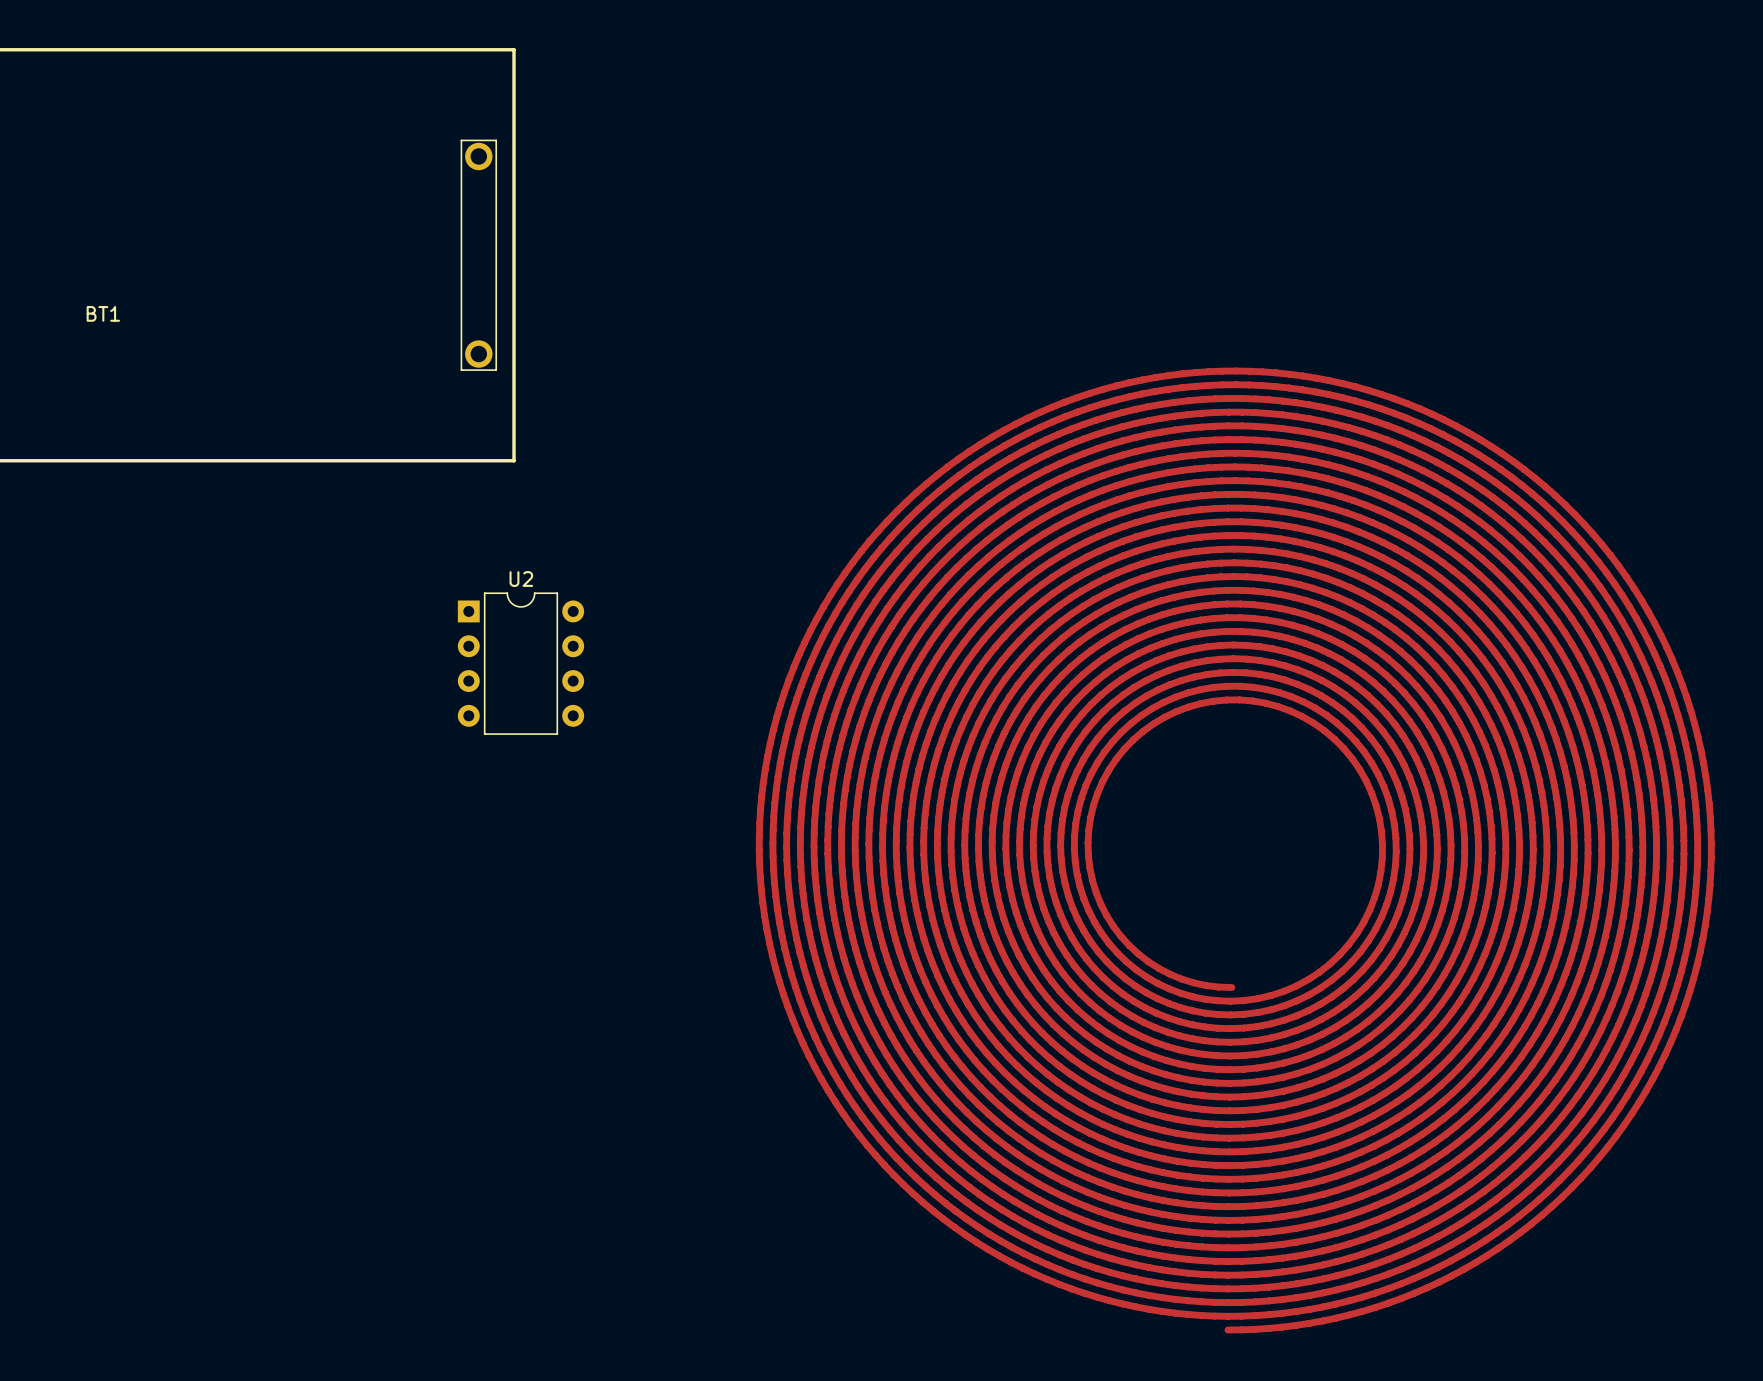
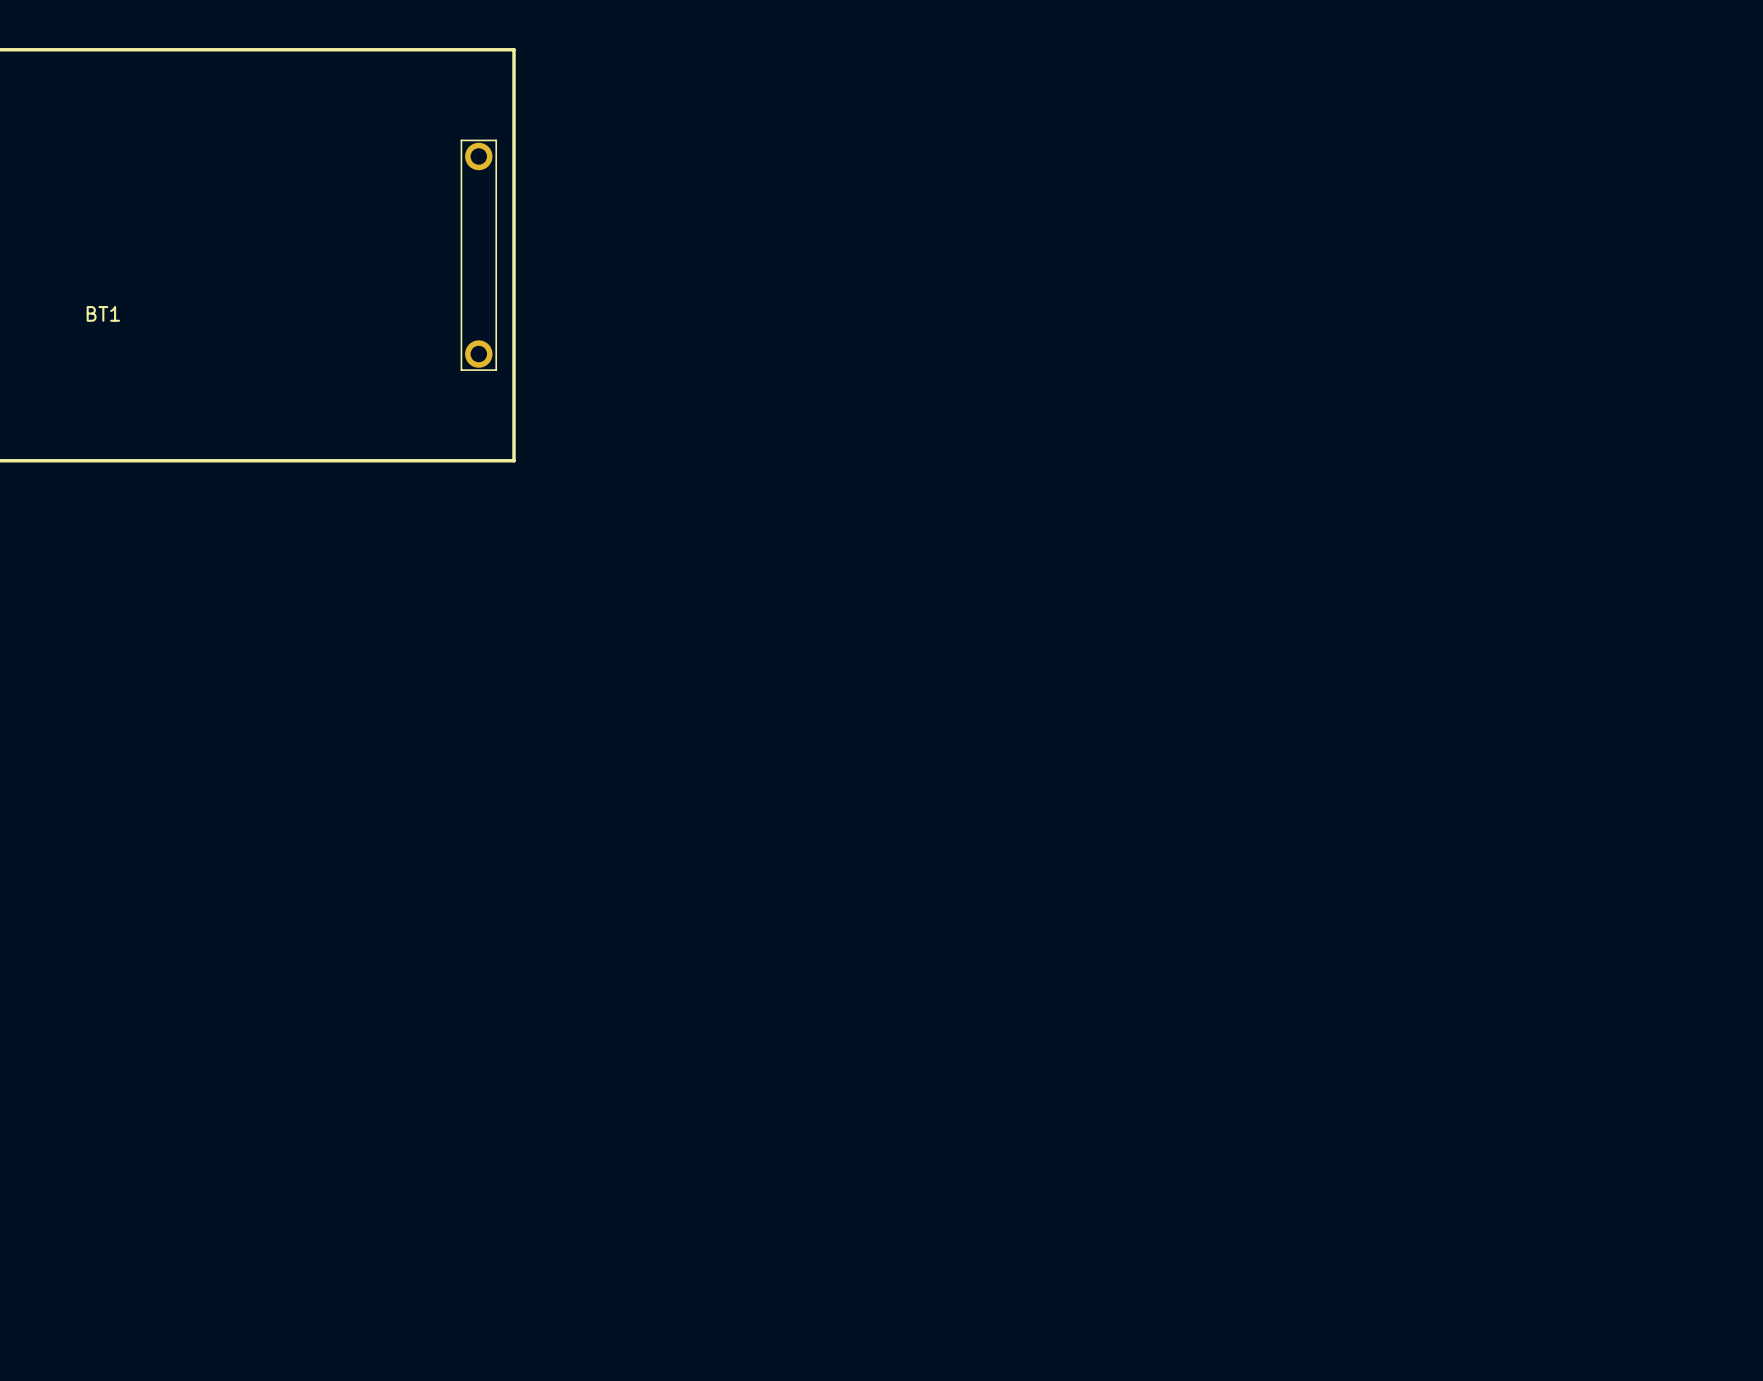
U2: (520, 663) -> none
top track: (1231, 987) (1193, 982) (1159, 968) (1129, 945) (1106, 915) (1092, 880) (1088, 842) (1093, 804) (1109, 769) (1133, 739) (1164, 717) (1200, 703) (1239, 699) (1278, 706) (1313, 723) (1343, 748) (1359, 769) (1376, 805) (1382, 844) (1378, 884) (1363, 922) (1339, 954) (1308, 979) (1270, 995) (1230, 1001) (1205, 999) (1181, 993) (1146, 977) (1117, 952) (1094, 922) (1083, 899) (1077, 874) (1074, 836) (1081, 798) (1097, 762) (1112, 741) (1130, 723) (1163, 702) (1200, 689) (1239, 686) (1278, 692) (1315, 707) (1346, 731) (1371, 762) (1383, 786) (1391, 811) (1396, 851) (1393, 878) (1386, 904) (1368, 940) (1342, 971) (1309, 994) (1271, 1009) (1244, 1014) (1217, 1014) (1193, 1010) (1168, 1003) (1135, 986) (1115, 970) (1098, 951) (1077, 919) (1068, 896) (1062, 871) (1061, 832) (1064, 807) (1072, 782) (1090, 748) (1106, 728) (1124, 710) (1157, 689) (1181, 680) (1207, 674) (1246, 672) (1272, 676) (1297, 684) (1332, 702) (1362, 728) (1385, 759) (1397, 783) (1405, 808) (1409, 835) (1409, 861) (1405, 888) (1397, 913) (1379, 949) (1362, 970) (1343, 988) (1308, 1010) (1270, 1023) (1243, 1028) (1217, 1028) (1192, 1024) (1168, 1017) (1144, 1007) (1123, 994) (1103, 977) (1086, 958) (1065, 926) (1056, 902) (1049, 877) (1047, 852) (1047, 826) (1052, 800) (1060, 776) (1078, 741) (1094, 721) (1112, 702) (1145, 680) (1169, 670) (1194, 662) (1233, 658) (1259, 660) (1285, 665) (1322, 680) (1344, 694) (1365, 711) (1390, 741) (1404, 764) (1414, 789) (1420, 815) (1423, 841) (1422, 868) (1418, 895) (1409, 920) (1398, 944) (1383, 967) (1365, 987) (1344, 1004) (1321, 1019) (1296, 1030) (1270, 1037) (1230, 1042) (1192, 1038) (1167, 1032) (1143, 1022) (1121, 1009) (1100, 994) (1082, 975) (1066, 955) (1053, 933) (1043, 909) (1037, 884) (1033, 858) (1033, 832) (1036, 806) (1043, 781) (1053, 757) (1066, 734) (1082, 713) (1100, 695) (1121, 679) (1144, 666) (1168, 655) (1194, 648) (1233, 645) (1259, 646) (1285, 651) (1311, 660) (1334, 671) (1357, 686) (1377, 704) (1402, 735) (1421, 770) (1430, 795) (1435, 821) (1437, 848) (1435, 875) (1430, 902) (1421, 927) (1410, 951) (1395, 974) (1377, 994) (1356, 1012) (1334, 1027) (1309, 1039) (1284, 1048) (1257, 1054) (1217, 1055) (1179, 1049) (1155, 1042) (1131, 1031) (1110, 1018) (1080, 993) (1063, 974) (1049, 953) (1037, 930) (1025, 893) (1020, 867) (1019, 842) (1021, 816) (1026, 790) (1034, 766) (1045, 742) (1059, 720) (1076, 700) (1094, 682) (1115, 666) (1138, 653) (1162, 643) (1187, 636) (1213, 632) (1240, 631) (1266, 633) (1292, 639) (1317, 647) (1340, 659) (1363, 674) (1383, 691) (1401, 710) (1417, 732) (1435, 767) (1443, 792) (1448, 818) (1451, 845) (1448, 885) (1442, 911) (1432, 936) (1420, 960) (1397, 993) (1378, 1012) (1357, 1029) (1334, 1043) (1309, 1054) (1283, 1063) (1257, 1068) (1217, 1069) (1179, 1063) (1154, 1056) (1119, 1040) (1097, 1026) (1068, 1000) (1051, 981) (1025, 936) (1012, 900) (1007, 874) (1005, 848) (1006, 822) (1014, 784) (1022, 759) (1033, 735) (1047, 713) (1073, 683) (1093, 666) (1114, 651) (1137, 638) (1162, 629) (1187, 622) (1213, 618) (1240, 617) (1266, 619) (1292, 625) (1317, 633) (1342, 644) (1364, 658) (1385, 674) (1404, 693) (1421, 714) (1441, 748) (1452, 773) (1461, 812) (1464, 838) (1462, 879) (1457, 905) (1449, 931) (1438, 955) (1417, 990) (1399, 1010) (1369, 1037) (1346, 1052) (1309, 1069) (1283, 1077) (1257, 1081) (1229, 1083) (1191, 1080) (1166, 1074) (1129, 1061) (1106, 1049) (1075, 1026) (1056, 1008) (1032, 977) (1019, 955) (1003, 919) (997, 893) (992, 854) (992, 828) (998, 789) (1005, 764) (1022, 728) (1036, 706) (1061, 676) (1080, 658) (1125, 629) (1161, 614) (1187, 608) (1240, 603) (1280, 608) (1305, 614) (1354, 635) (1397, 667) (1433, 707) (1453, 741) (1468, 779) (1476, 818) (1478, 845) (1475, 886) (1470, 912) (1456, 950) (1444, 974) (1420, 1007) (1402, 1027) (1370, 1053) (1347, 1067) (1310, 1083) (1283, 1091) (1257, 1095) (1216, 1096) (1178, 1091) (1140, 1080) (1105, 1064) (1083, 1050) (1053, 1024) (1035, 1005) (1013, 973) (1001, 950) (987, 913) (980, 874) (978, 835) (980, 808) (989, 770) (998, 745) (1016, 710) (1032, 688) (1058, 659) (1079, 642) (1124, 614) (1161, 600) (1187, 594) (1240, 590) (1280, 594) (1306, 600) (1355, 620) (1389, 642) (1410, 659) (1445, 700) (1465, 735) (1480, 772) (1489, 812) (1491, 839) (1490, 879) (1482, 919) (1468, 957) (1456, 981) (1432, 1015) (1414, 1035) (1383, 1061) (1360, 1076) (1323, 1093) (1297, 1101) (1257, 1109) (1216, 1110) (1178, 1105) (1140, 1095) (1105, 1079) (1082, 1066) (1052, 1042) (1025, 1013) (1002, 981) (990, 958) (976, 922) (967, 884) (964, 844) (966, 818) (972, 779) (985, 742) (1002, 707) (1017, 685) (1043, 655) (1062, 637) (1095, 614) (1118, 602) (1155, 588) (1181, 581) (1234, 576) (1273, 579) (1299, 584) (1337, 597) (1361, 608) (1395, 629) (1416, 646) (1452, 686) (1473, 720) (1489, 757) (1500, 795) (1505, 835) (1504, 876) (1497, 915) (1484, 954) (1473, 978) (1451, 1012) (1425, 1043) (1394, 1070) (1371, 1085) (1335, 1103) (1296, 1116) (1256, 1123) (1229, 1124) (1190, 1121) (1152, 1113) (1115, 1100) (1081, 1081) (1049, 1058) (1021, 1030) (997, 999) (978, 965) (963, 928) (954, 890) (951, 851) (952, 811) (960, 773) (973, 735) (991, 700) (1005, 678) (1031, 648) (1050, 629) (1082, 606) (1105, 593) (1142, 577) (1168, 570) (1207, 564) (1234, 562) (1274, 565) (1300, 570) (1338, 582) (1362, 593) (1397, 614) (1418, 630) (1447, 658) (1464, 679) (1485, 713) (1502, 750) (1513, 789) (1518, 829) (1518, 869) (1513, 909) (1501, 948) (1485, 985) (1463, 1020) (1437, 1051) (1406, 1078) (1372, 1100) (1336, 1118) (1297, 1130) (1256, 1136) (1216, 1137) (1164, 1130) (1127, 1119) (1091, 1103) (1058, 1082) (1027, 1057) (1001, 1027) (978, 995) (960, 960) (947, 922) (939, 884) (937, 844) (940, 805) (948, 766) (961, 728) (979, 693) (1001, 660) (1028, 631) (1059, 605) (1093, 584) (1117, 572) (1155, 559) (1181, 553) (1220, 549) (1247, 549) (1287, 553) (1313, 559) (1351, 573) (1375, 584) (1409, 606) (1430, 623) (1459, 651) (1476, 672) (1503, 718) (1518, 756) (1528, 795) (1532, 836) (1532, 876) (1525, 916) (1513, 955) (1497, 992) (1475, 1027) (1449, 1058) (1419, 1085) (1385, 1109) (1349, 1127) (1310, 1141) (1270, 1149) (1216, 1151) (1164, 1144) (1127, 1134) (1091, 1118) (1057, 1098) (1016, 1065) (990, 1036) (967, 1004) (949, 969) (932, 919) (925, 880) (923, 841) (926, 801) (934, 763) (947, 725) (965, 690) (987, 657) (1013, 627) (1043, 600) (1075, 578) (1099, 566) (1136, 551) (1174, 541) (1214, 536) (1241, 535) (1280, 538) (1319, 547) (1357, 560) (1381, 572) (1415, 593) (1436, 610) (1465, 638) (1482, 658) (1511, 704) (1527, 740) (1539, 779) (1545, 819) (1546, 873) (1540, 913) (1529, 952) (1514, 989) (1485, 1035) (1459, 1066) (1430, 1094) (1397, 1118) (1348, 1142) (1310, 1155) (1270, 1163) (1229, 1165) (1177, 1161) (1138, 1152) (1090, 1133) (1055, 1114) (1014, 1081) (986, 1053) (963, 1022) (943, 987) (923, 938) (914, 900) (909, 847) (912, 808) (922, 756) (935, 718) (953, 683) (975, 650) (1001, 619) (1030, 593) (1063, 570) (1098, 551) (1135, 536) (1174, 527) (1214, 522) (1241, 521) (1281, 525) (1320, 533) (1358, 546) (1382, 557) (1417, 578) (1449, 602) (1477, 631) (1494, 651) (1523, 697) (1539, 734) (1554, 786) (1559, 826) (1559, 880) (1552, 920) (1541, 959) (1525, 996) (1497, 1042) (1471, 1074) (1431, 1110) (1398, 1133) (1349, 1157) (1310, 1169) (1269, 1176) (1229, 1179) (1176, 1175) (1138, 1166) (1089, 1148) (1054, 1129) (1011, 1098) (983, 1070) (951, 1028) (931, 994) (911, 945) (902, 906) (896, 854) (897, 814) (906, 762) (918, 724) (941, 676) (963, 643) (989, 612) (1018, 585) (1051, 561) (1085, 542) (1122, 526) (1161, 515) (1201, 509) (1227, 508) (1268, 509) (1307, 516) (1346, 527) (1383, 542) (1418, 562) (1451, 586) (1480, 614) (1498, 634) (1528, 678) (1552, 727) (1567, 779) (1573, 819) (1573, 873) (1568, 913) (1553, 966) (1537, 1003) (1509, 1049) (1483, 1081) (1444, 1118) (1410, 1141) (1362, 1166) (1323, 1180) (1269, 1190) (1229, 1193) (1176, 1188) (1125, 1176) (1076, 1157) (1041, 1137) (999, 1105) (971, 1077) (939, 1035) (919, 1001) (899, 952) (886, 900) (882, 847) (884, 807) (894, 755) (906, 717) (929, 669) (951, 635) (977, 605) (1006, 577) (1038, 553) (1073, 533) (1109, 516) (1148, 504) (1187, 497) (1228, 494) (1268, 495) (1308, 502) (1347, 512) (1384, 527) (1420, 547) (1453, 570) (1483, 597) (1510, 627) (1540, 672) (1564, 720) (1579, 772) (1586, 812) (1587, 866) (1580, 920) (1565, 972) (1549, 1010) (1521, 1056) (1486, 1098) (1445, 1134) (1411, 1157) (1362, 1181) (1323, 1194) (1269, 1204) (1228, 1206) (1176, 1202) (1125, 1191) (1076, 1172) (1030, 1146) (988, 1114) (952, 1076) (921, 1033) (902, 998) (883, 948) (872, 896) (868, 844) (871, 804) (880, 752) (898, 702) (922, 654) (945, 621) (980, 582) (1011, 556) (1044, 533) (1079, 514) (1116, 499) (1155, 489) (1194, 482) (1234, 480) (1274, 482) (1314, 489) (1353, 500) (1390, 515) (1425, 534) (1459, 557) (1489, 584) (1516, 613) (1548, 657) (1572, 705) (1589, 756) (1599, 809) (1601, 863) (1595, 917) (1581, 969) (1566, 1007) (1539, 1054) (1506, 1097) (1467, 1134) (1423, 1166) (1374, 1191) (1323, 1208) (1269, 1218) (1228, 1220) (1176, 1216) (1124, 1205) (1075, 1187) (1028, 1161) (986, 1130) (948, 1093) (916, 1051) (890, 1004) (871, 955) (859, 903) (855, 850) (858, 797) (868, 745) (886, 695) (910, 647) (933, 614) (968, 574) (998, 548) (1031, 525) (1066, 505) (1116, 485) (1155, 475) (1194, 468) (1234, 466) (1288, 470) (1328, 478) (1366, 490) (1403, 506) (1438, 526) (1471, 550) (1501, 576) (1528, 606) (1560, 650) (1584, 698) (1602, 749) (1612, 802) (1615, 856) (1610, 910) (1598, 963) (1578, 1014) (1551, 1061) (1518, 1104) (1479, 1142) (1435, 1174) (1387, 1200) (1336, 1219) (1283, 1230) (1228, 1234) (1162, 1228) (1111, 1215) (1062, 1196) (1016, 1170) (974, 1137) (936, 1100) (904, 1057) (878, 1011) (859, 961) (846, 910) (841, 857) (843, 803) (852, 751) (869, 700) (892, 652) (921, 607) (956, 567) (986, 540) (1019, 517) (1054, 496) (1103, 475) (1141, 464) (1181, 456) (1221, 453) (1275, 455) (1315, 461) (1354, 472) (1392, 486) (1439, 511) (1473, 534) (1504, 560) (1532, 589) (1572, 644) (1596, 692) (1614, 743) (1625, 796) (1629, 850) (1625, 904) (1614, 957) (1595, 1008) (1563, 1068) (1530, 1111) (1491, 1150) (1448, 1182) (1400, 1209) (1349, 1229) (1296, 1242) (1242, 1247) (1189, 1245) (1137, 1236) (1074, 1216) (1027, 1192) (973, 1155) (934, 1118) (901, 1077) (873, 1032) (847, 971) (834, 919) (828, 867) (828, 813) (836, 761) (850, 710) (871, 661) (899, 615) (932, 573) (960, 545) (1002, 511) (1036, 490) (1084, 467) (1122, 455) (1161, 445) (1201, 440) (1255, 440) (1295, 444) (1347, 455) (1385, 468) (1434, 492) (1468, 513) (1500, 538) (1529, 566) (1571, 618) (1599, 664) (1620, 714) (1634, 766) (1642, 833) (1641, 887) (1632, 940) (1617, 992) (1588, 1054) (1558, 1099) (1522, 1140) (1481, 1175) (1424, 1212) (1375, 1235) (1323, 1250) (1269, 1259) (1215, 1261) (1162, 1256) (1098, 1240) (1049, 1220) (992, 1186) (950, 1153) (905, 1105) (874, 1062) (845, 1002) (828, 952) (816, 886) (814, 833) (821, 767) (834, 715) (854, 666) (880, 619) (911, 576) (938, 546) (979, 511) (1012, 488) (1059, 463) (1096, 448) (1148, 434) (1188, 428) (1242, 425) (1282, 428) (1335, 438) (1373, 449) (1423, 470) (1458, 490) (1491, 513) (1522, 539) (1567, 589) (1598, 634) (1627, 695) (1643, 746) (1655, 813) (1656, 867) (1650, 921) (1637, 974) (1612, 1037) (1585, 1084) (1543, 1137) (1504, 1175) (1449, 1214) (1400, 1239) (1349, 1258) (1296, 1270) (1242, 1275) (1175, 1271) (1110, 1258) (1060, 1240) (1001, 1209) (958, 1178) (910, 1132) (877, 1091) (843, 1033) (823, 984) (806, 919) (800, 866) (802, 800) (811, 747) (831, 683) (854, 635) (883, 590) (908, 558) (946, 521) (977, 495) (1022, 466) (1058, 448) (1109, 430) (1148, 420) (1201, 413) (1242, 412) (1295, 416) (1335, 424) (1387, 439) (1424, 455) (1471, 482) (1504, 505) (1553, 551) (1587, 593) (1623, 651) (1644, 701) (1662, 766) (1669, 820) (1668, 887) (1660, 941) (1641, 1006) (1618, 1056) (1581, 1113) (1546, 1154) (1495, 1199) (1450, 1229) (1388, 1259) (1336, 1275) (1282, 1285) (1214, 1288) (1148, 1281) (1097, 1268) (1035, 1244) (978, 1210) (926, 1168) (889, 1129) (851, 1075) (820, 1016) (799, 952) (790, 900) (786, 833) (791, 780) (806, 714) (824, 664) (849, 616) (871, 583) (905, 541) (934, 513) (976, 479) (1010, 458) (1058, 434) (1096, 420) (1148, 406) (1188, 400) (1242, 398) (1282, 401) (1335, 410) (1374, 421) (1425, 441) (1460, 459) (1516, 498) (1565, 544) (1607, 597) (1635, 644) (1661, 707) (1675, 759) (1683, 827) (1682, 881) (1672, 948) (1653, 1013) (1623, 1074) (1593, 1120) (1548, 1171) (1507, 1207) (1450, 1245) (1401, 1268) (1336, 1289) (1282, 1299) (1214, 1302) (1149, 1295) (1084, 1278) (1023, 1253) (966, 1219) (925, 1186) (879, 1138) (840, 1084) (809, 1025) (791, 974) (777, 909) (772, 843) (778, 776) (788, 724) (805, 673) (822, 637) (849, 591) (873, 558) (908, 518) (938, 491) (981, 459) (1016, 439) (1064, 416) (1103, 403) (1155, 391) (1195, 386) (1249, 384) (1289, 388) (1342, 397) (1381, 408) (1443, 434) (1500, 469) (1553, 512) (1589, 551) (1629, 606) (1660, 666) (1682, 730) (1693, 783) (1697, 850) (1692, 918) (1677, 984) (1658, 1035) (1627, 1095) (1587, 1150) (1539, 1198) (1497, 1232) (1438, 1267) (1375, 1293) (1309, 1309) (1255, 1315) (1201, 1315) (1135, 1306) (1071, 1288) (1010, 1262) (954, 1227) (903, 1184) (858, 1134) (821, 1079) (792, 1019) (772, 955) (761, 889) (759, 836) (763, 783) (770, 743) (784, 692) (799, 654) (823, 606) (845, 572) (878, 530) (906, 501) (947, 467) (980, 444) (1027, 418) (1064, 402) (1115, 385) (1155, 377) (1195, 372) (1235, 371) (1289, 374) (1329, 380) (1381, 394) (1419, 408) (1468, 432) (1502, 453) (1545, 486) (1574, 514) (1610, 555) (1633, 588) (1660, 635) (1677, 672) (1694, 723) (1703, 763) (1710, 817) (1711, 857) (1707, 911) (1700, 952) (1685, 1004) (1670, 1042) (1646, 1090) (1624, 1125) (1590, 1167) (1562, 1197) (1520, 1232) (1486, 1255) (1439, 1282) (1401, 1298) (1349, 1314) (1309, 1323) (1268, 1328) (1227, 1330) -> none

